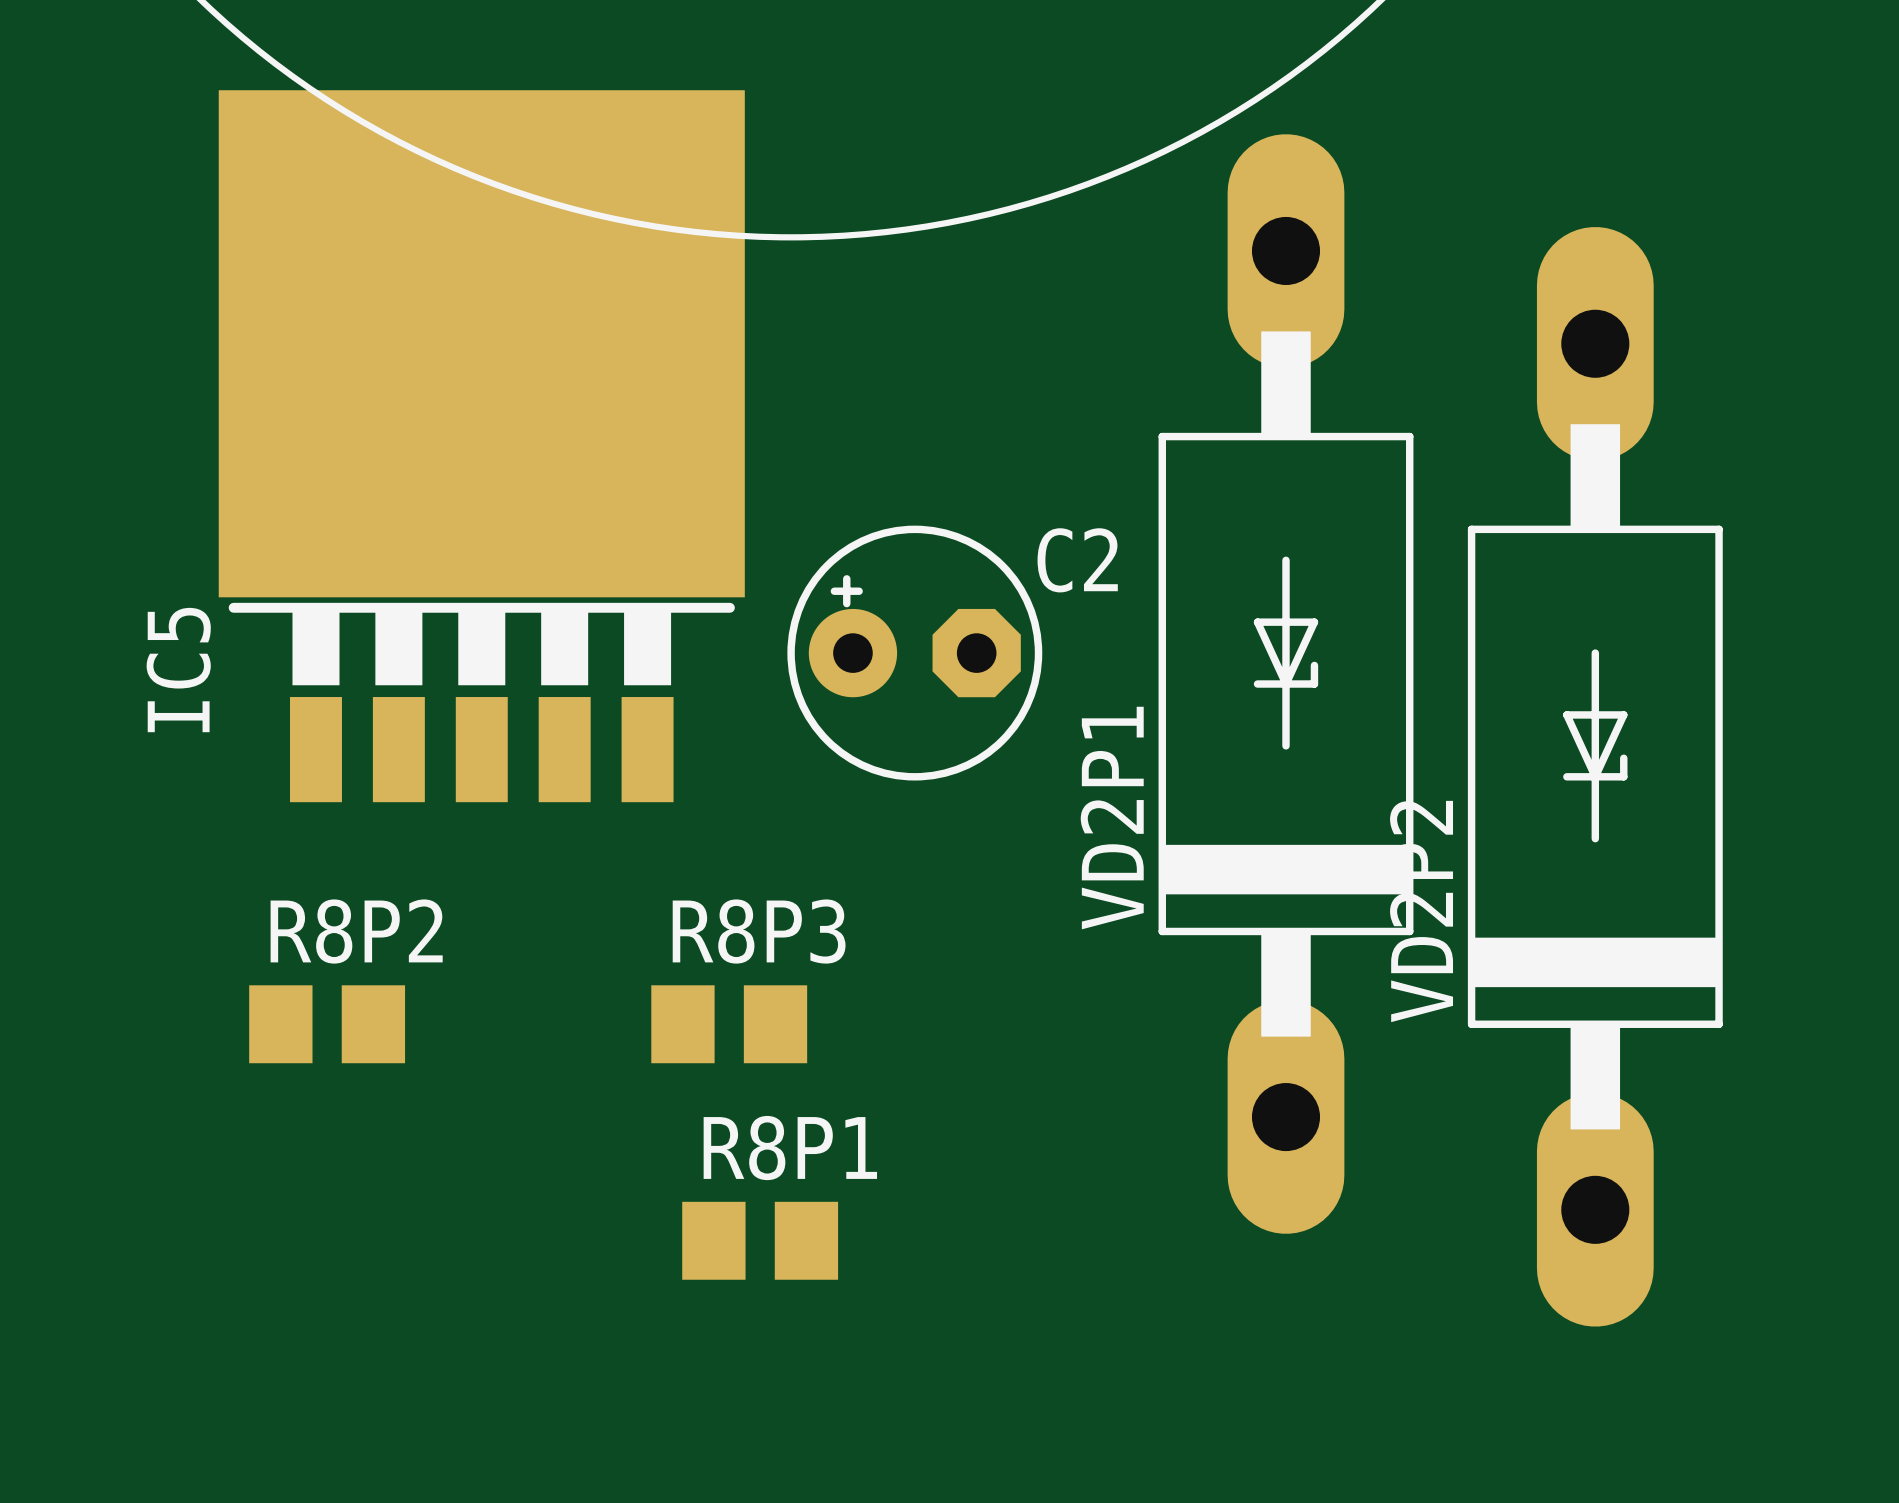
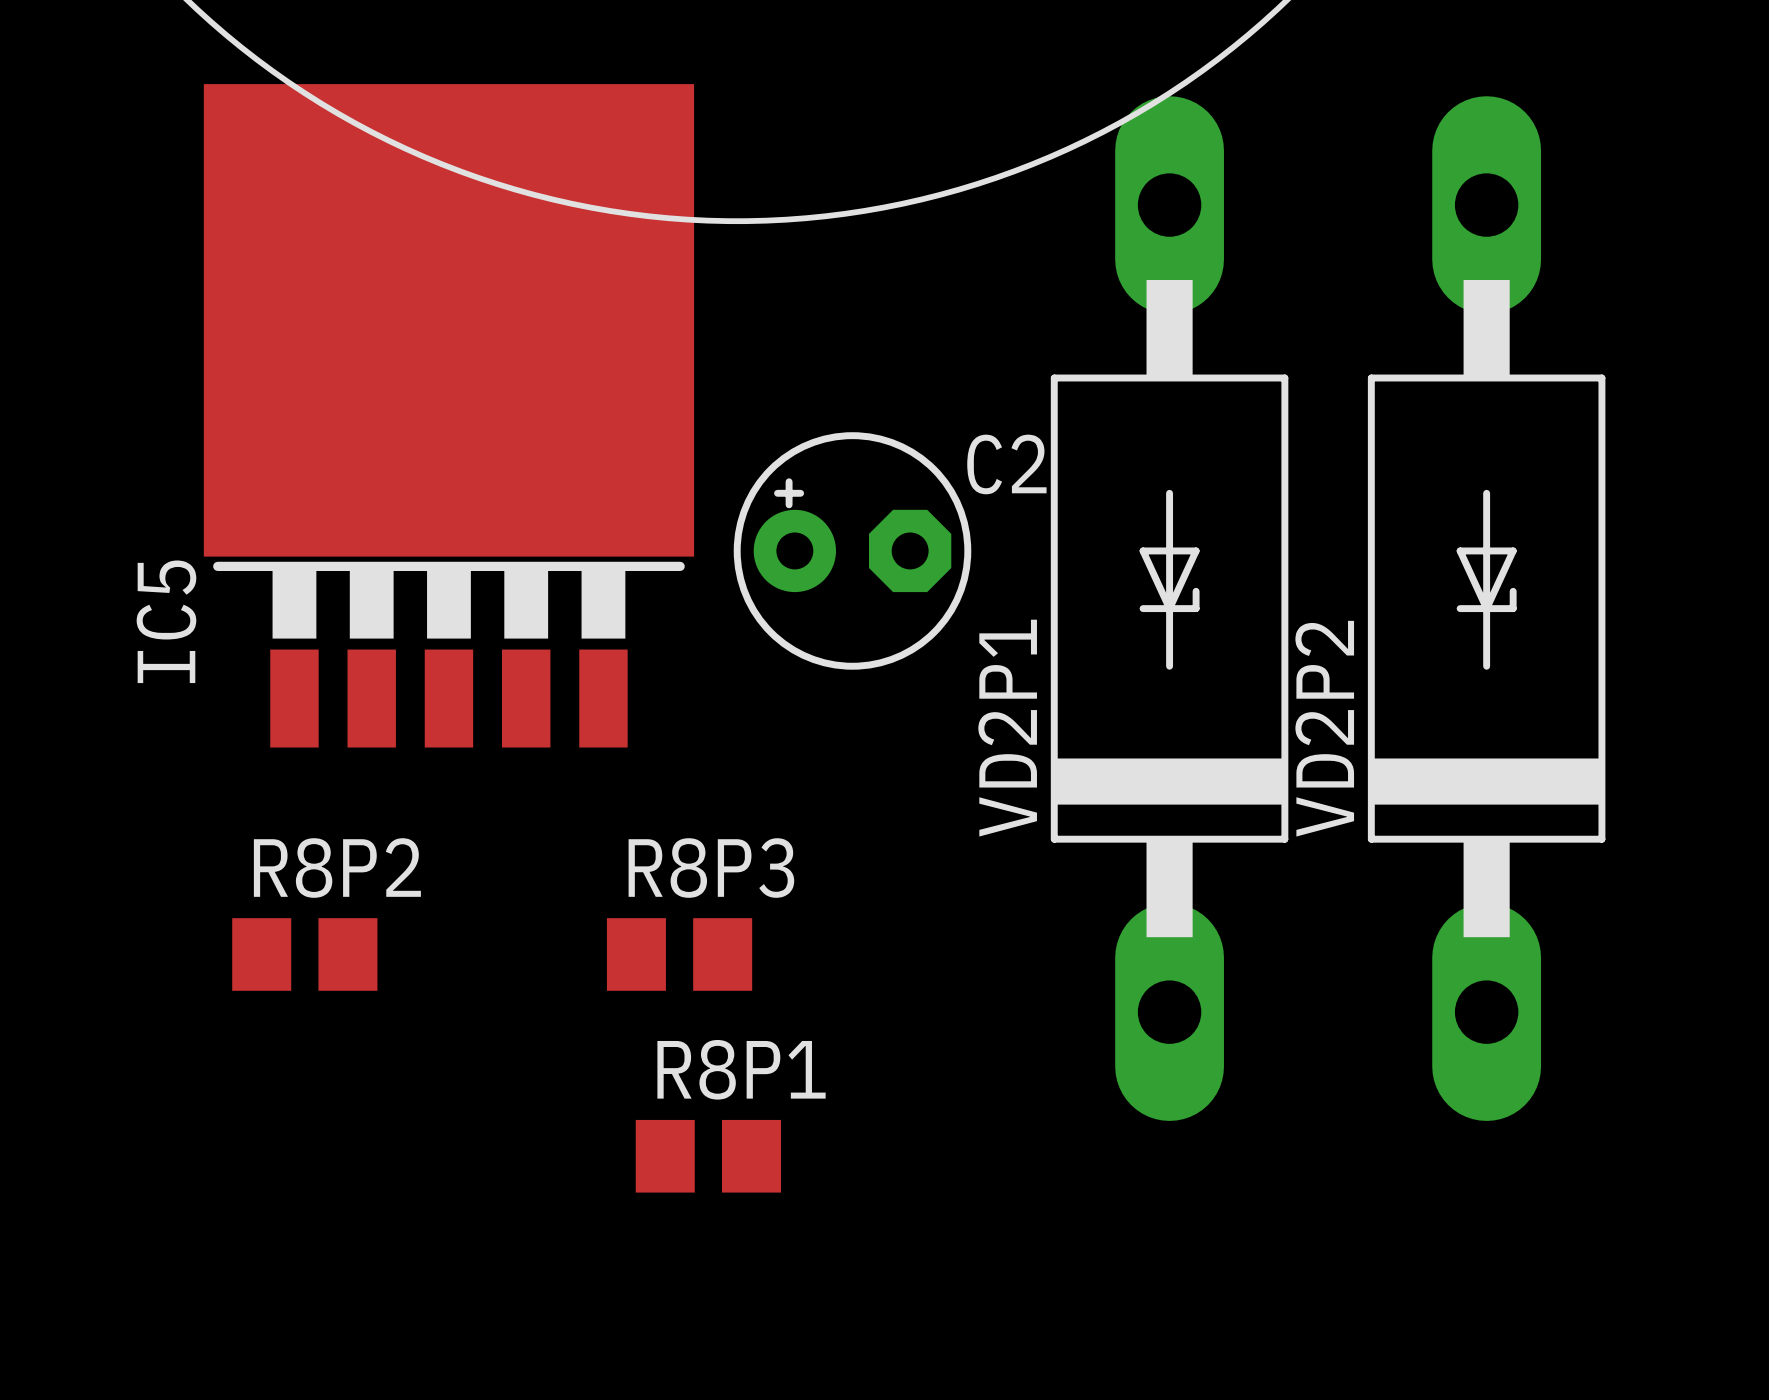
C2 position: (914, 653) -> (852, 550)
VD2P1 position: (1285, 684) -> (1169, 608)
VD2P2 position: (1595, 776) -> (1486, 608)

